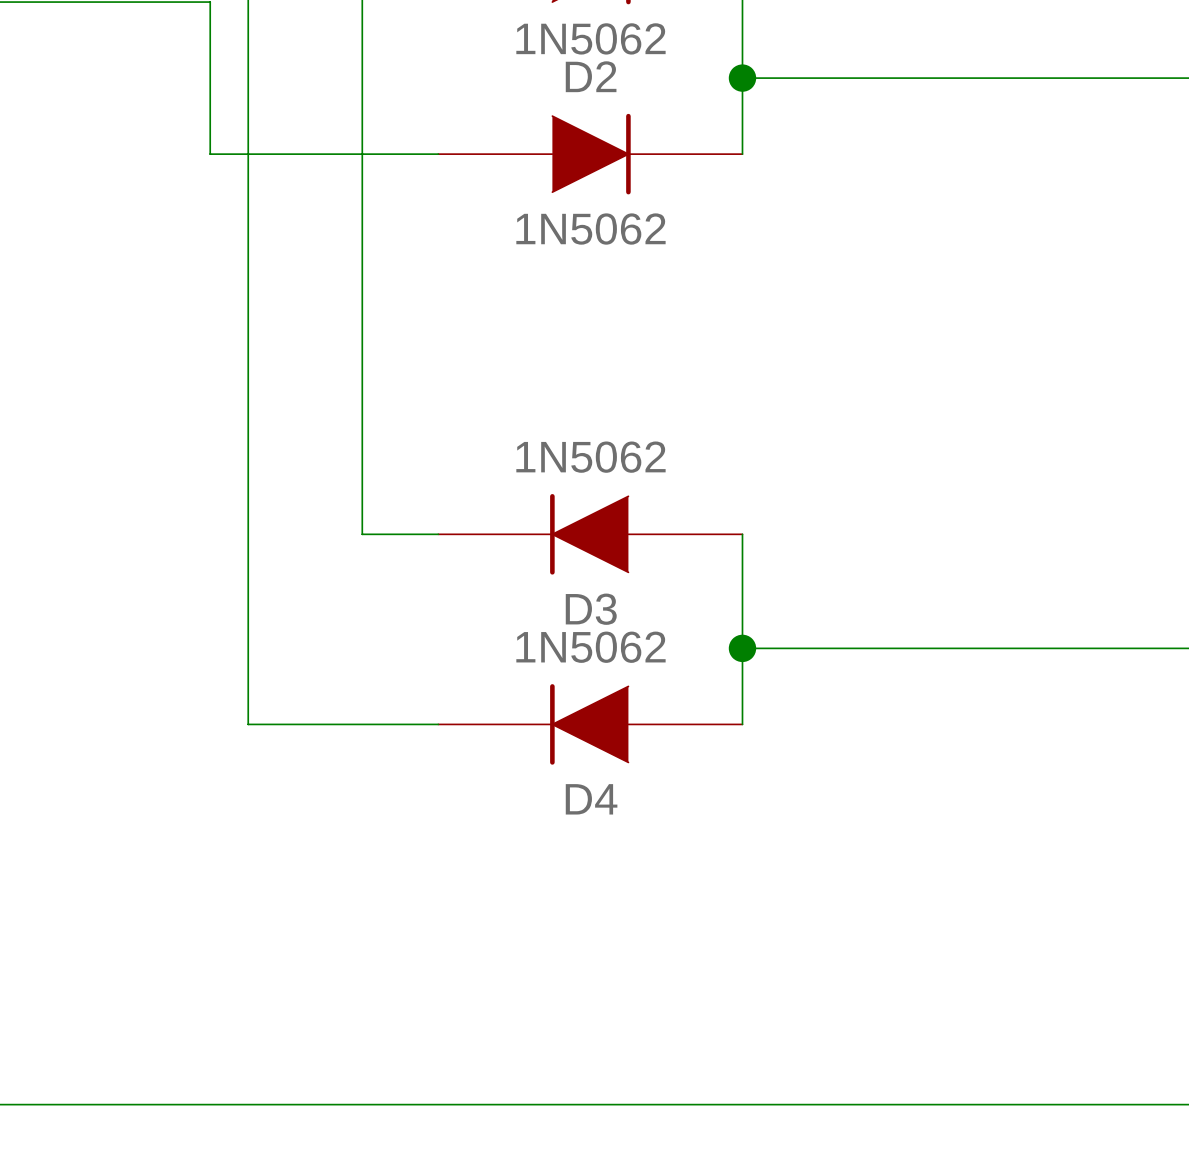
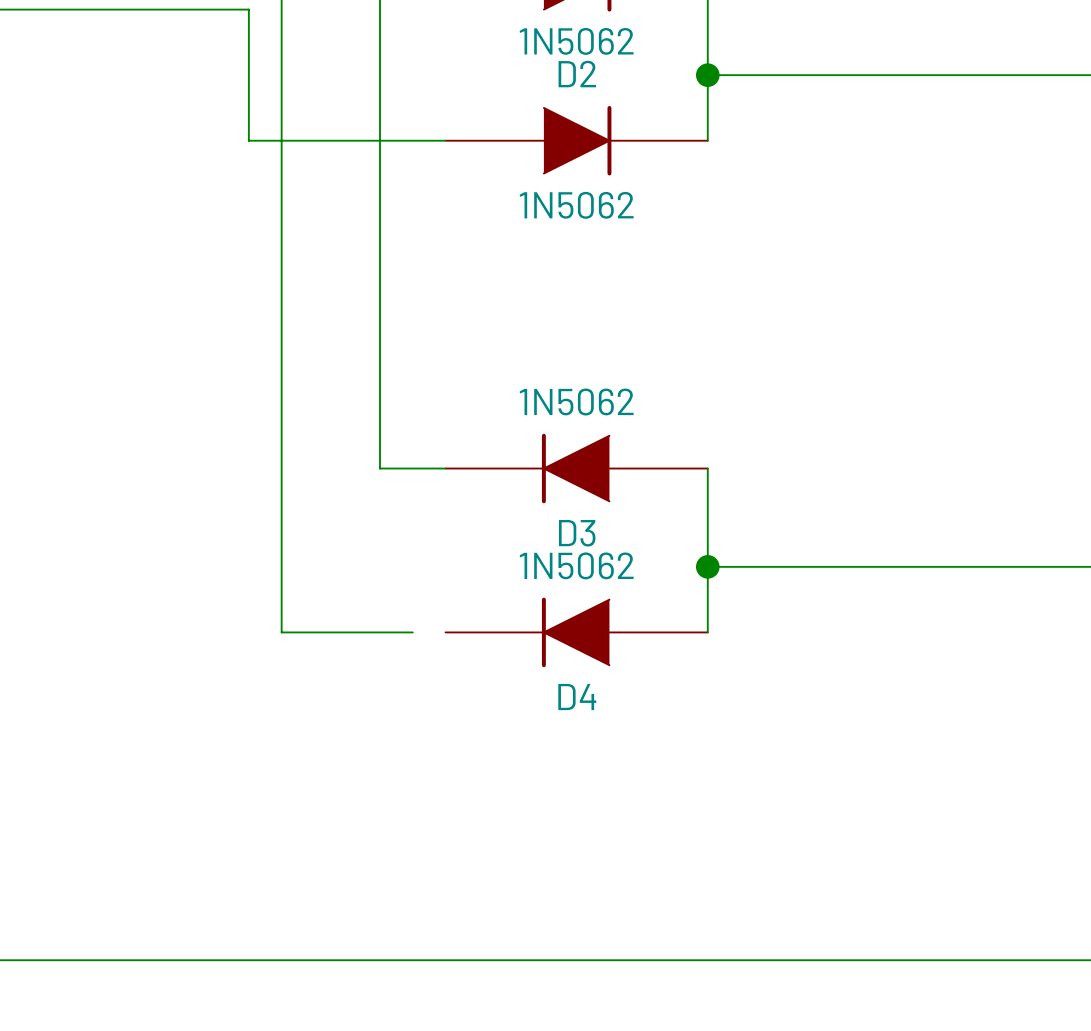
wire: (400, 724) (438, 724) -> none

